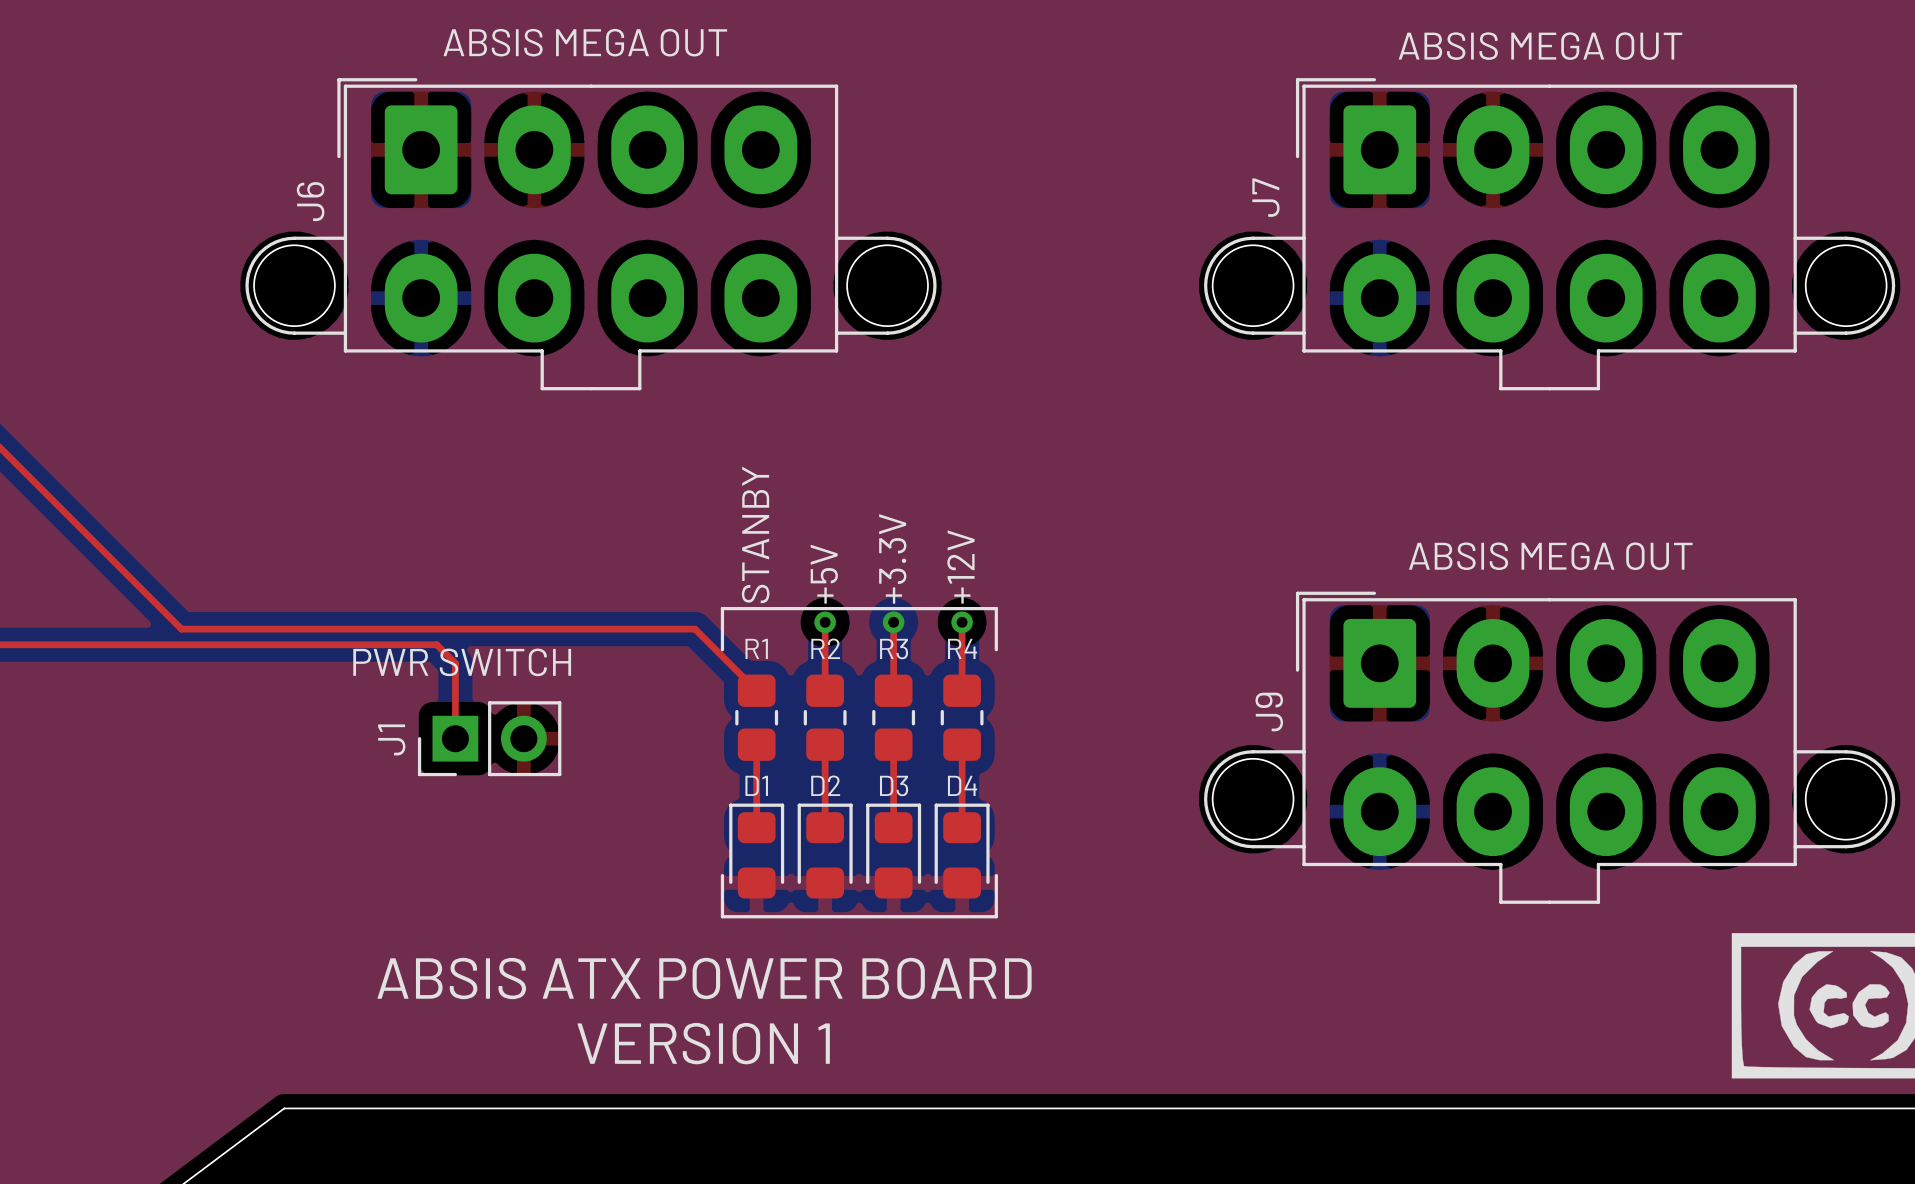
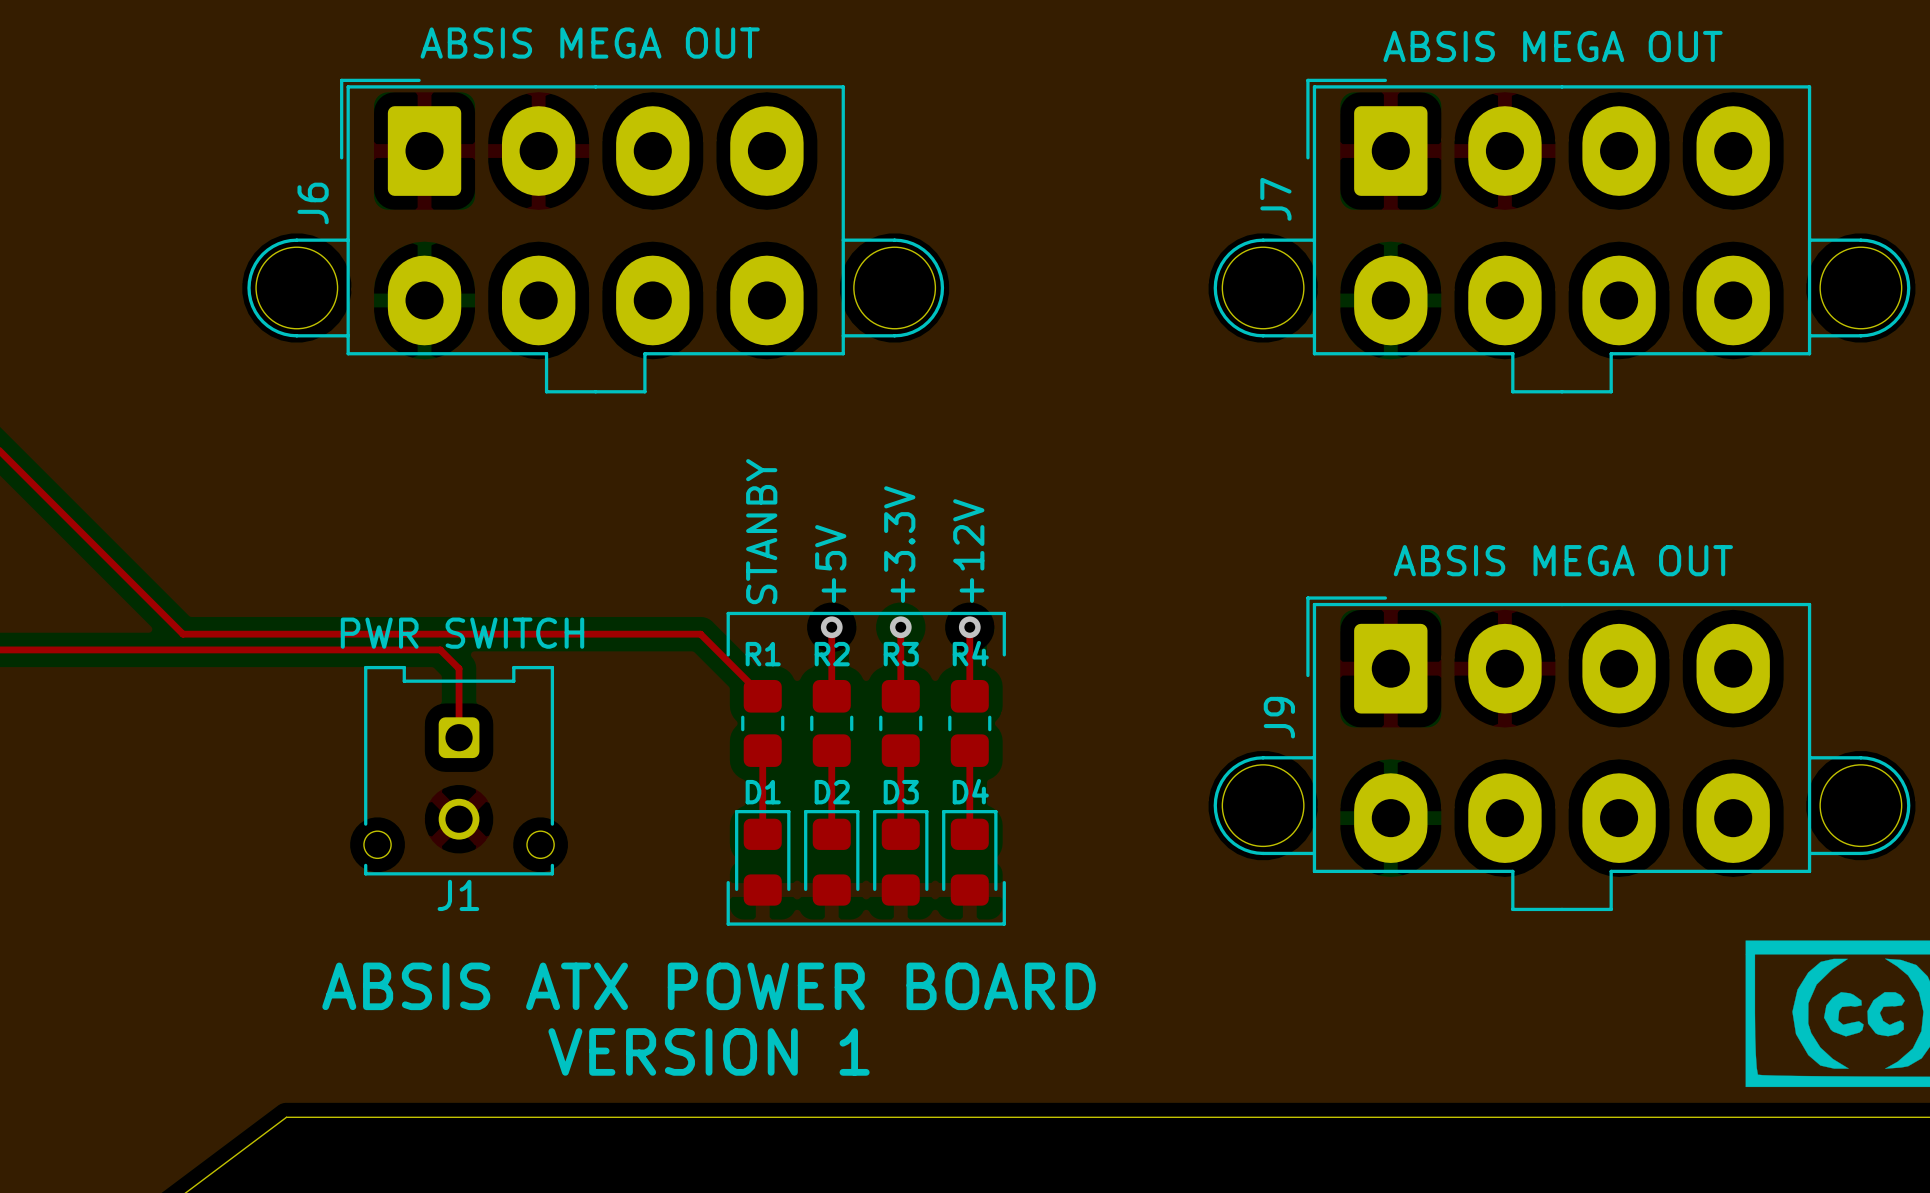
text position: PWR SWITCH (462, 662) -> PWR SWITCH (462, 633)
J1 footprint: [417, 701, 562, 777] -> [363, 665, 555, 876]
J1 name position: J1 (391, 739) -> J1 (458, 895)

